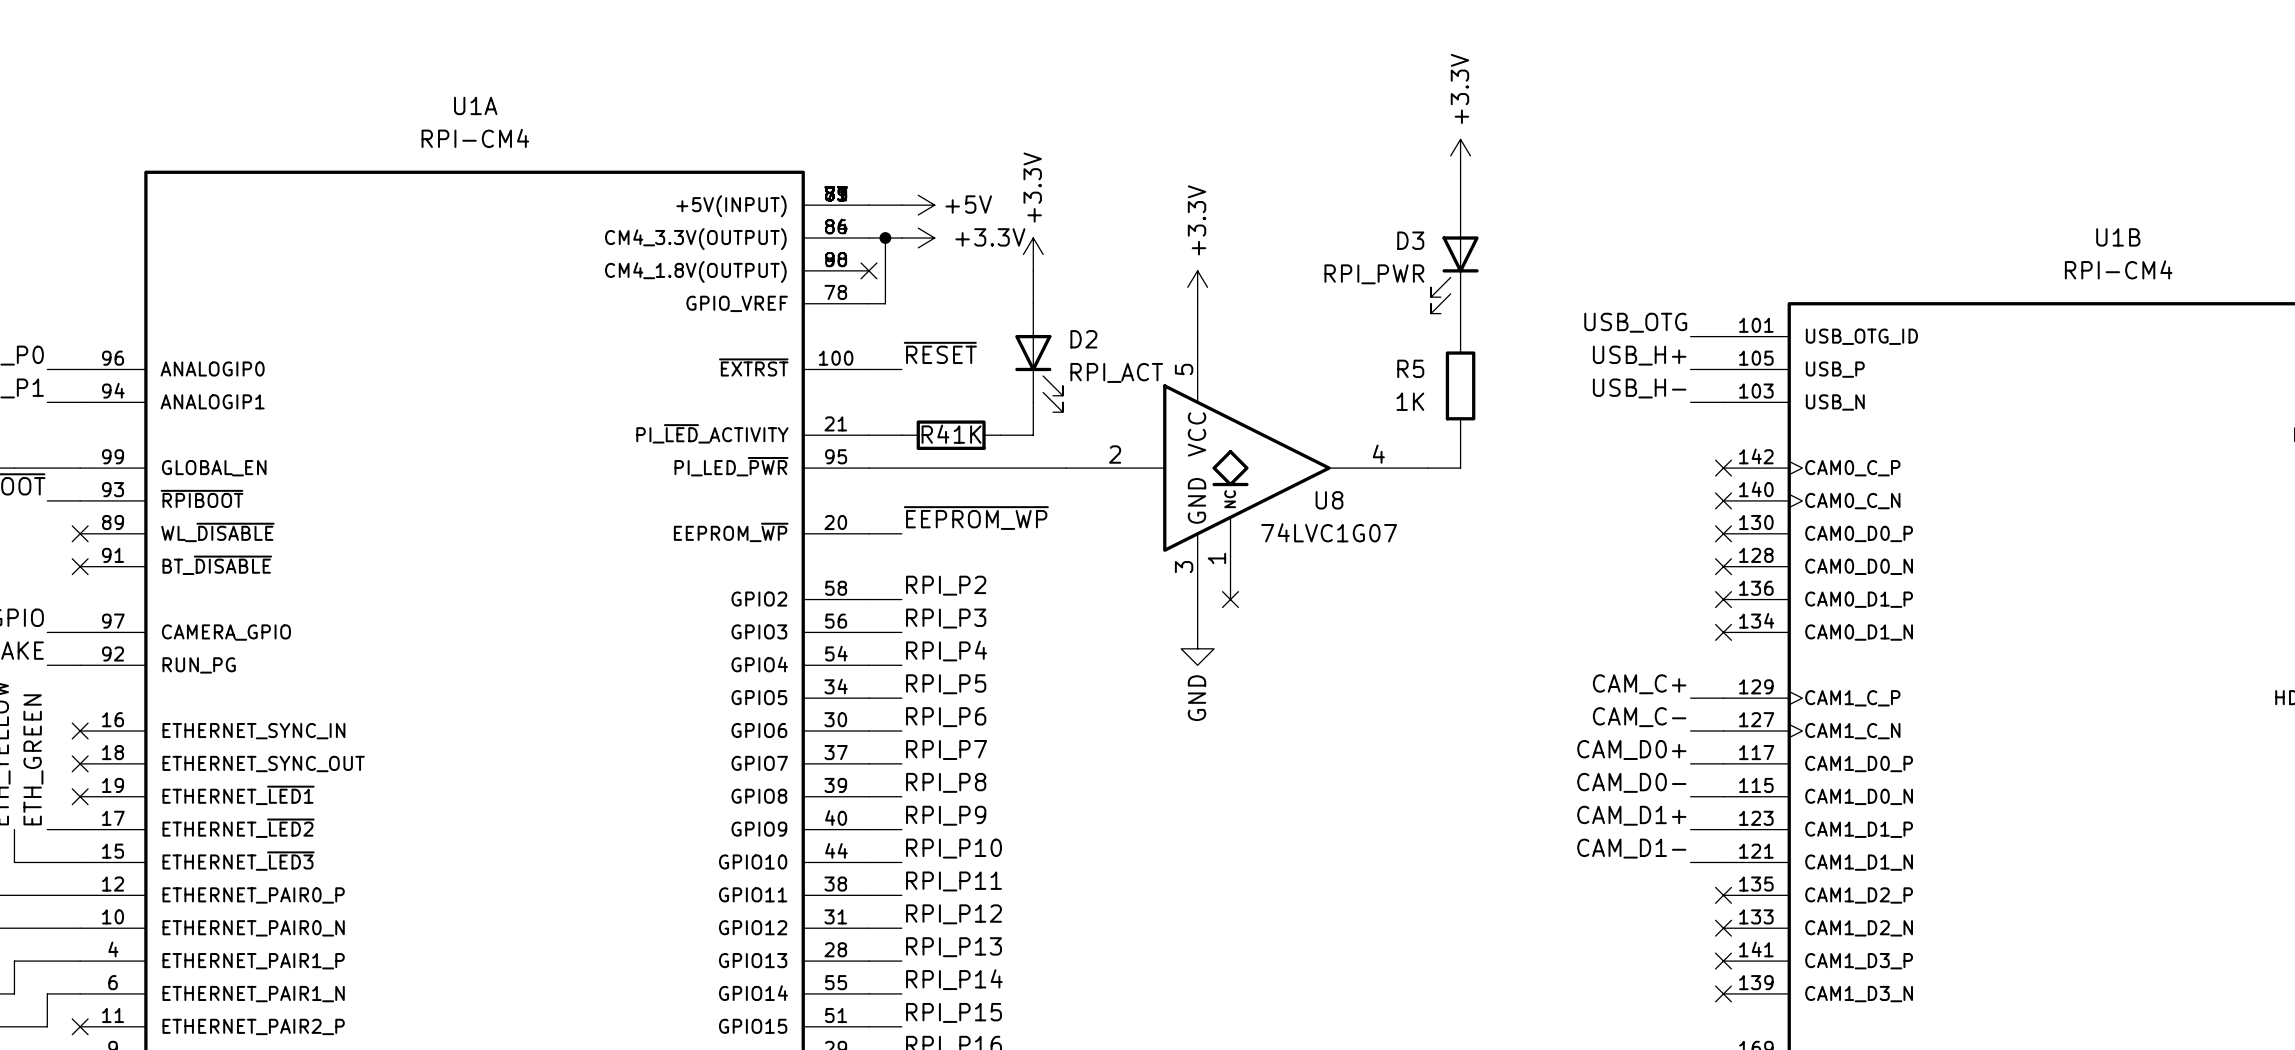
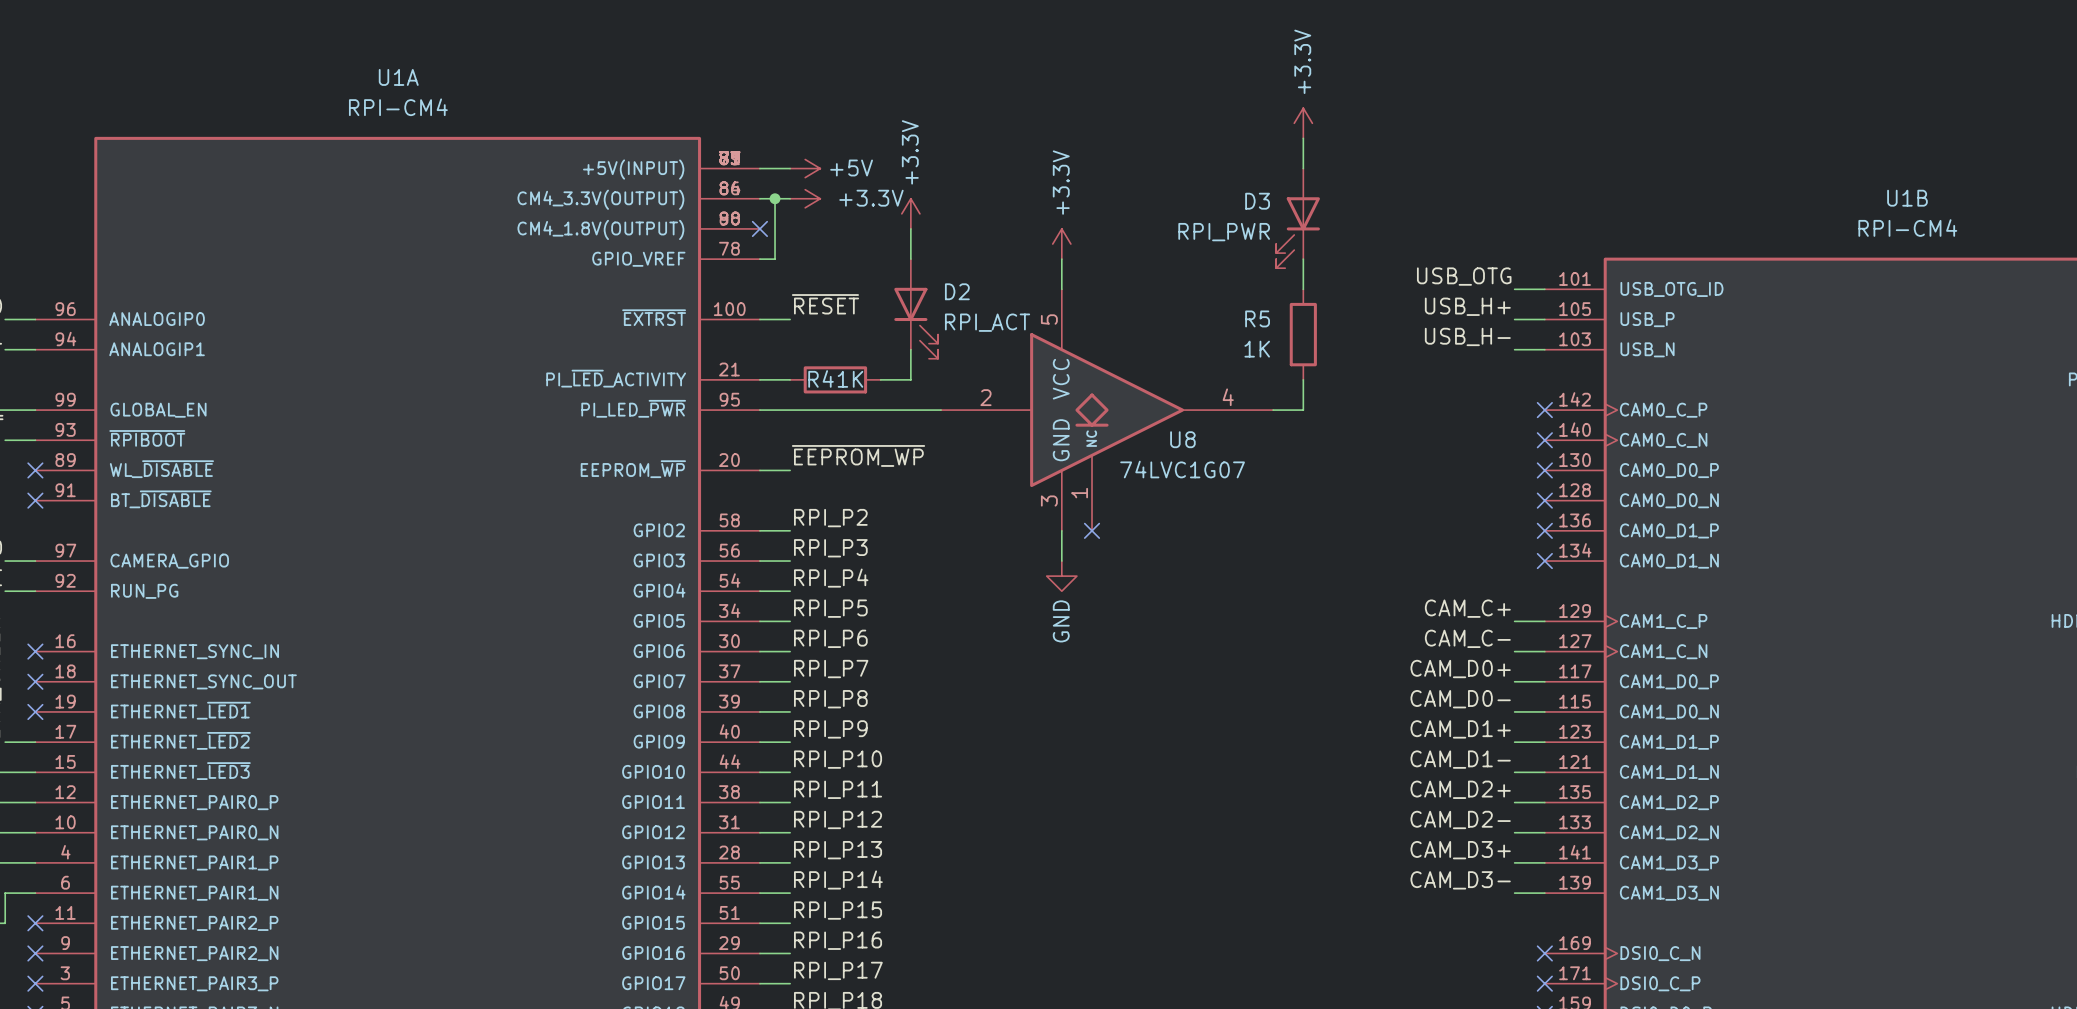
label: none -> CAM_D2+ (1460, 789)
wire: none -> (1514, 802) (1544, 802)
no-connect mark: (1723, 895) -> none
label: none -> CAM_D2- (1460, 819)
wire: none -> (1514, 832) (1544, 832)
no-connect mark: (1723, 928) -> none
label: none -> CAM_D3+ (1460, 850)
wire: none -> (1514, 862) (1544, 862)
no-connect mark: (1723, 961) -> none
label: none -> CAM_D3- (1460, 880)
wire: none -> (1514, 893) (1544, 893)
no-connect mark: (1723, 993) -> none

